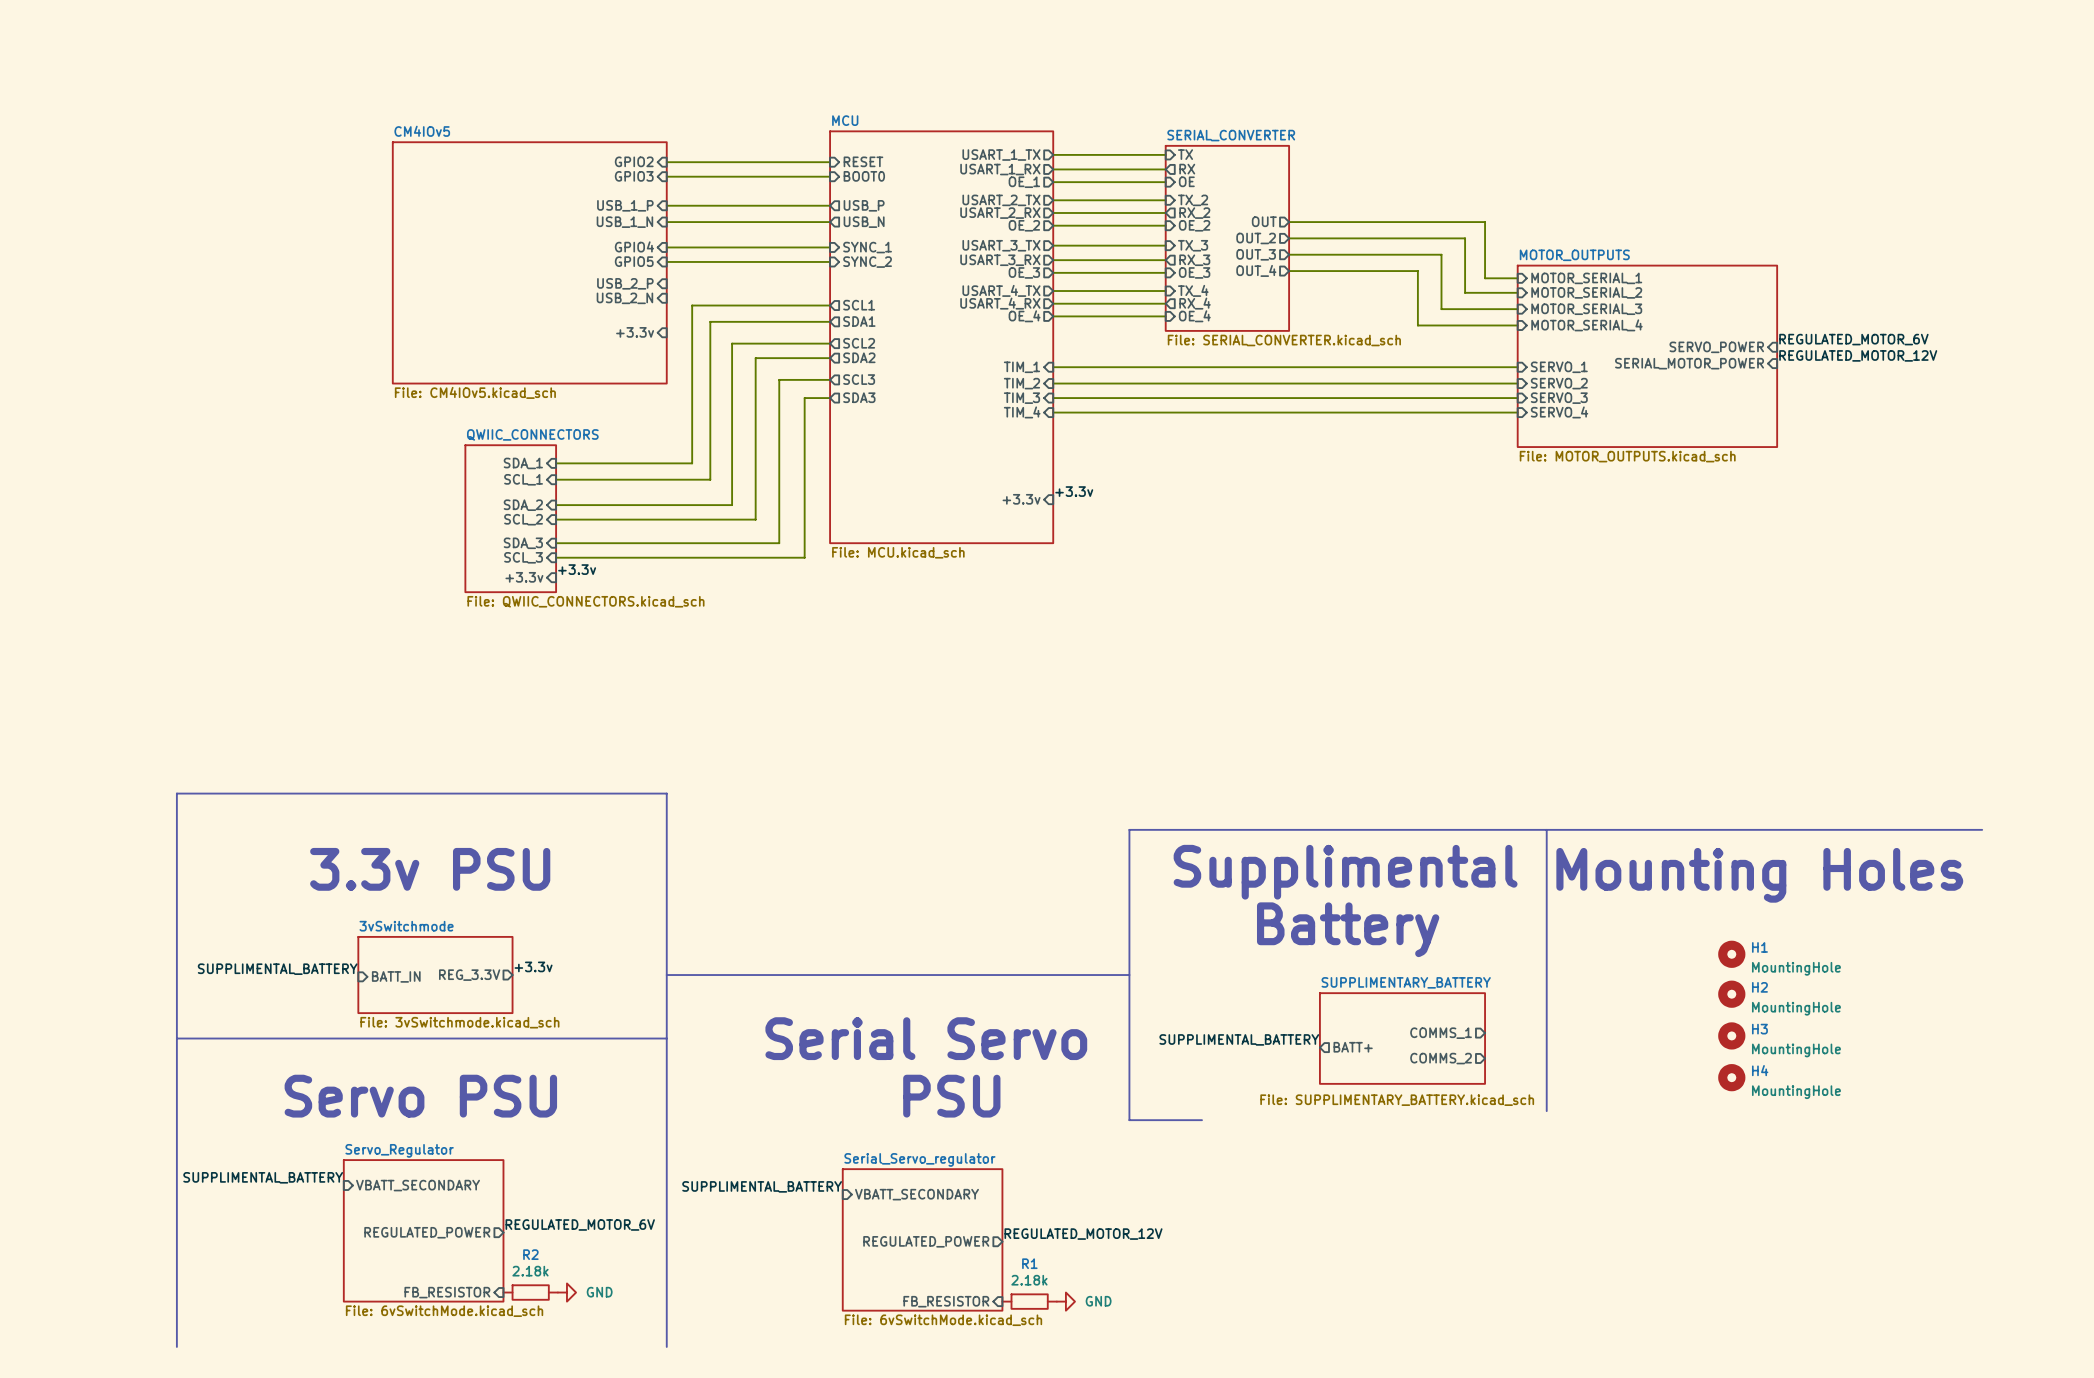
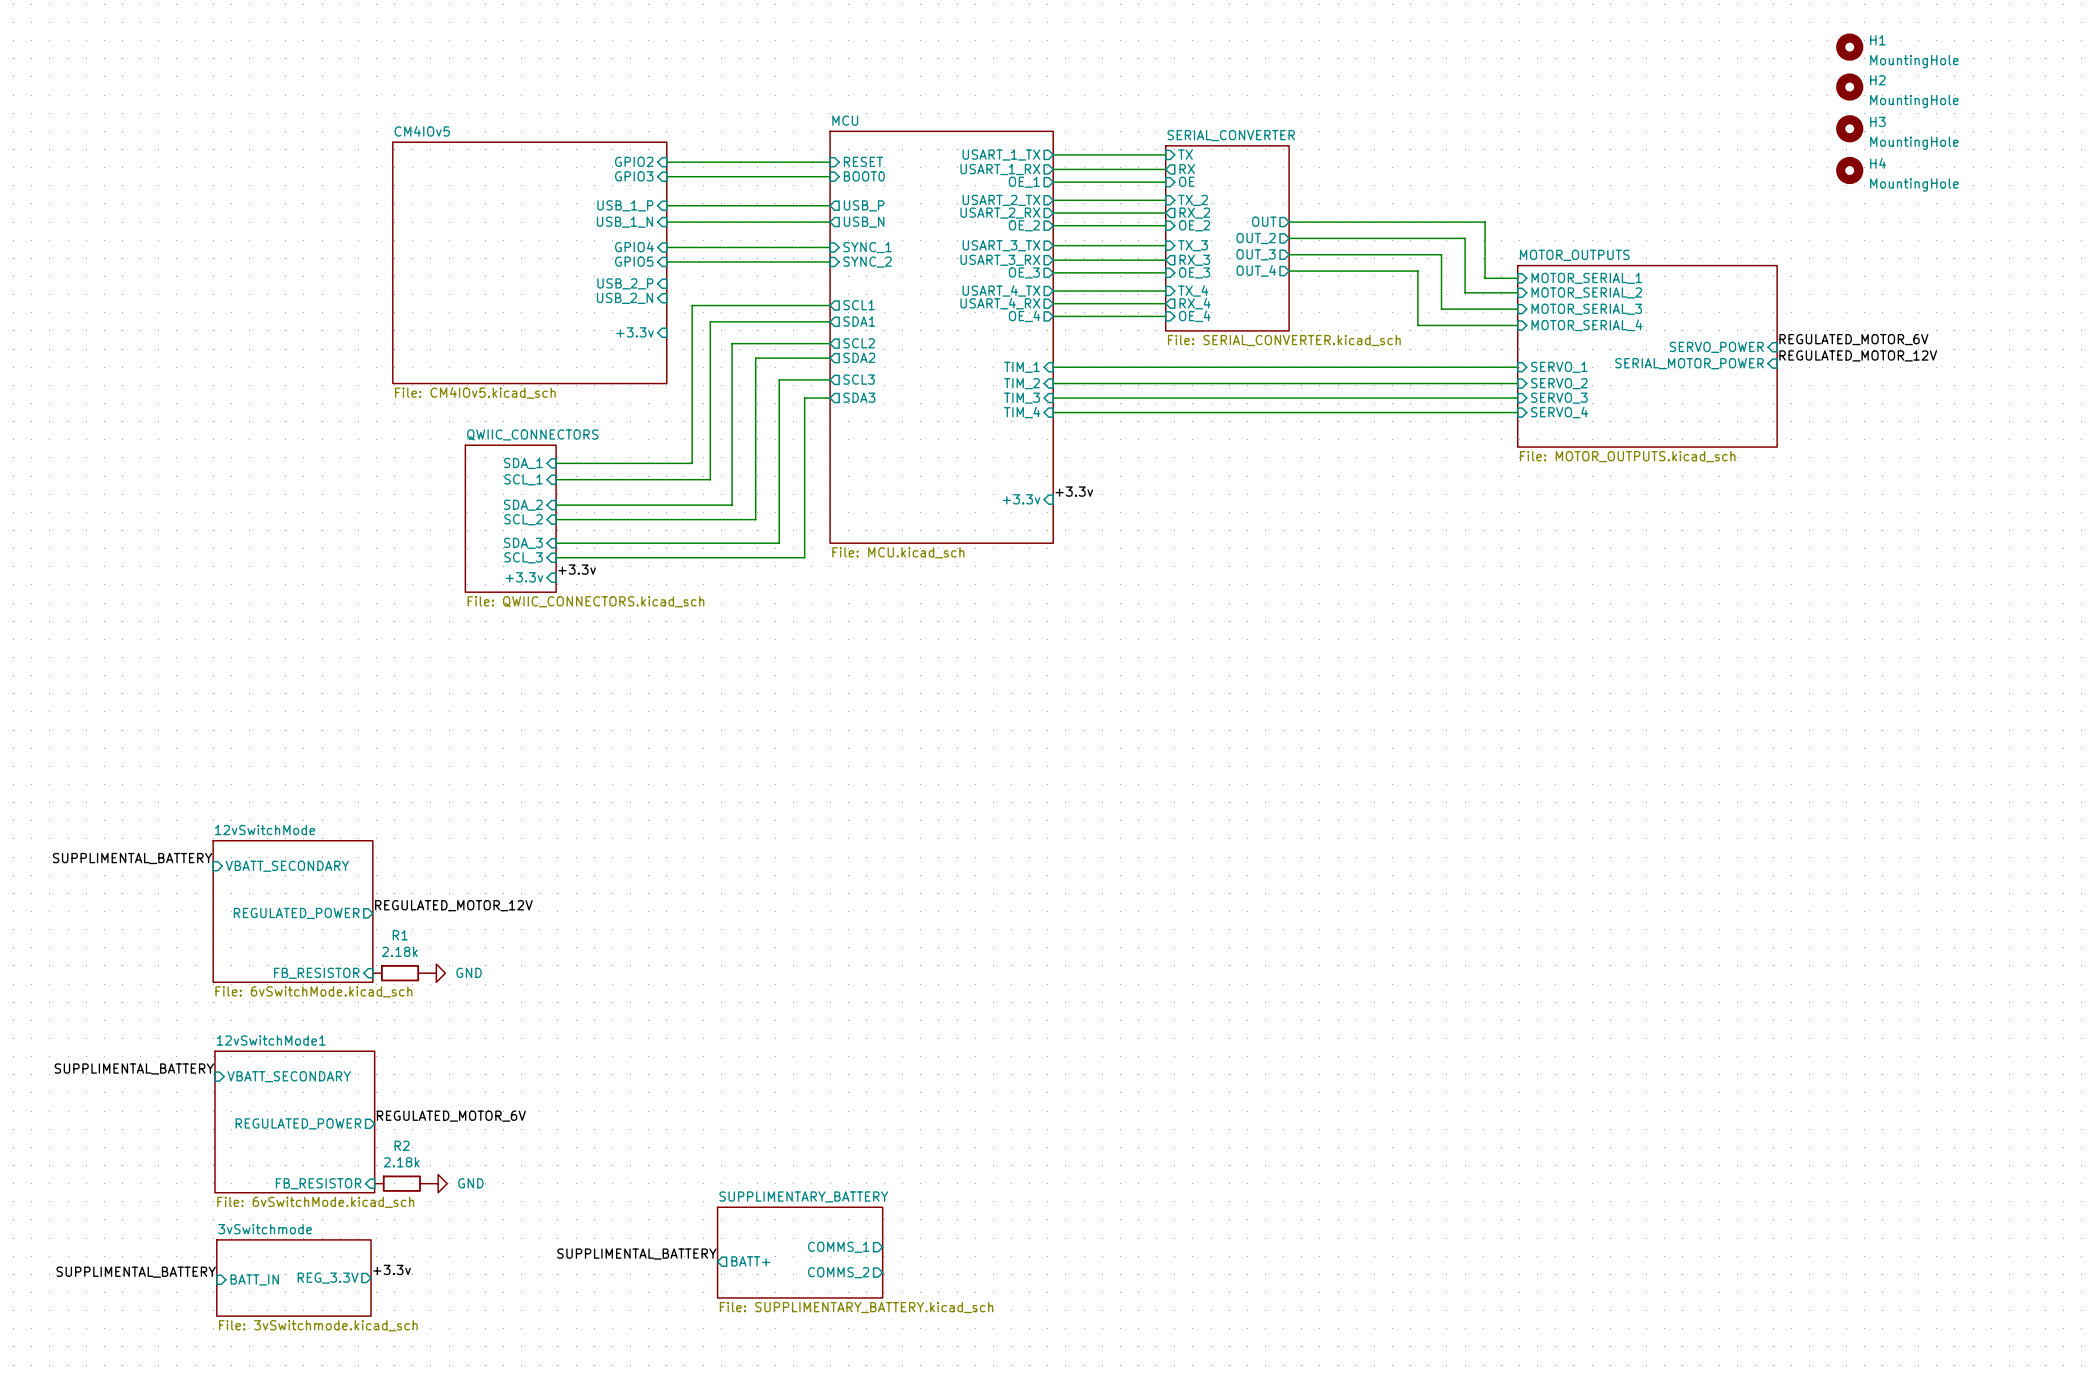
line: (1546, 829) (1546, 1111) -> none
line: (1982, 829) (1129, 829) (1129, 1120) (1202, 1120) -> none
label: none -> SUPPLIMENTAL_BATTERY (132, 858)
sheet pin: none -> VBATT_SECONDARY (287, 866)
text: 3.3v PSU (430, 869) -> none
text: Supplimental (1345, 872) -> none
text: Mounting Holes (1759, 875) -> none
label: none -> REGULATED_MOTOR_12V (453, 905)
sheet 12vSwitchMode: none -> File: 6vSwitchMode.kicad_sch (293, 911)
sheet pin: none -> REGULATED_POWER (296, 913)
text: Battery (1348, 929) -> none
H1 position: (1731, 954) -> (1849, 47)
label: +3.3v (533, 966) -> none
label: SUPPLIMENTAL_BATTERY (277, 969) -> none
sheet pin: none -> FB_RESISTOR (316, 973)
power symbol: none -> GND (436, 973)
sheet 3vSwitchmode position: (435, 975) -> (293, 1278)
sheet pin: REG_3.3V (469, 975) -> none
line: (666, 975) (1129, 975) -> none
sheet pin: BATT_IN (396, 976) -> none
H2 position: (1731, 994) -> (1849, 87)
sheet pin: COMMS_1 (1441, 1033) -> none
H3 position: (1731, 1035) -> (1849, 128)
line: (176, 1038) (666, 1038) -> none
text: Serial Servo (926, 1038) -> none
sheet SUPPLIMENTARY_BATTERY: File: SUPPLIMENTARY_BATTERY.kicad_sch (1402, 1038) -> none
label: SUPPLIMENTAL_BATTERY (1239, 1039) -> none
sheet pin: BATT+ (1353, 1047) -> none
sheet pin: COMMS_2 (1441, 1058) -> none
label: none -> SUPPLIMENTAL_BATTERY (134, 1068)
H4 position: (1731, 1077) -> (1849, 170)
text: Servo PSU (420, 1096) -> none
text: PSU (951, 1096) -> none
sheet 12vSwitchMode1: none -> File: 6vSwitchMode.kicad_sch (294, 1121)
label: SUPPLIMENTAL_BATTERY (263, 1177) -> none
sheet pin position: VBATT_SECONDARY (418, 1185) -> VBATT_SECONDARY (289, 1076)
label position: SUPPLIMENTAL_BATTERY (762, 1186) -> SUPPLIMENTAL_BATTERY (636, 1254)
sheet pin: VBATT_SECONDARY (916, 1194) -> none
label position: REGULATED_MOTOR_6V (580, 1224) -> REGULATED_MOTOR_6V (451, 1116)
sheet Servo_Regulator: File: 6vSwitchMode.kicad_sch (423, 1230) -> none
sheet pin position: REGULATED_POWER (427, 1232) -> REGULATED_POWER (298, 1123)
label: REGULATED_MOTOR_12V (1083, 1234) -> none
sheet Serial_Servo_regulator: File: 6vSwitchMode.kicad_sch (922, 1239) -> none
sheet pin: REGULATED_POWER (926, 1241) -> none
sheet pin: none -> COMMS_1 (838, 1247)
sheet SUPPLIMENTARY_BATTERY: none -> File: SUPPLIMENTARY_BATTERY.kicad_sch (800, 1252)
sheet pin: none -> BATT+ (750, 1261)
label: none -> +3.3v (392, 1269)
label: none -> SUPPLIMENTAL_BATTERY (136, 1272)
sheet pin: none -> COMMS_2 (838, 1272)
sheet pin: none -> REG_3.3V (328, 1278)
sheet pin: none -> BATT_IN (254, 1279)
sheet pin position: FB_RESISTOR (447, 1292) -> FB_RESISTOR (318, 1183)
R2 position: (530, 1292) -> (401, 1183)
power symbol position: GND (566, 1292) -> GND (438, 1183)
sheet pin: FB_RESISTOR (946, 1301) -> none
R1 position: (1029, 1301) -> (400, 973)
power symbol: GND (1065, 1301) -> none
line: (176, 1346) (176, 793) (666, 793) (666, 1346) -> none

